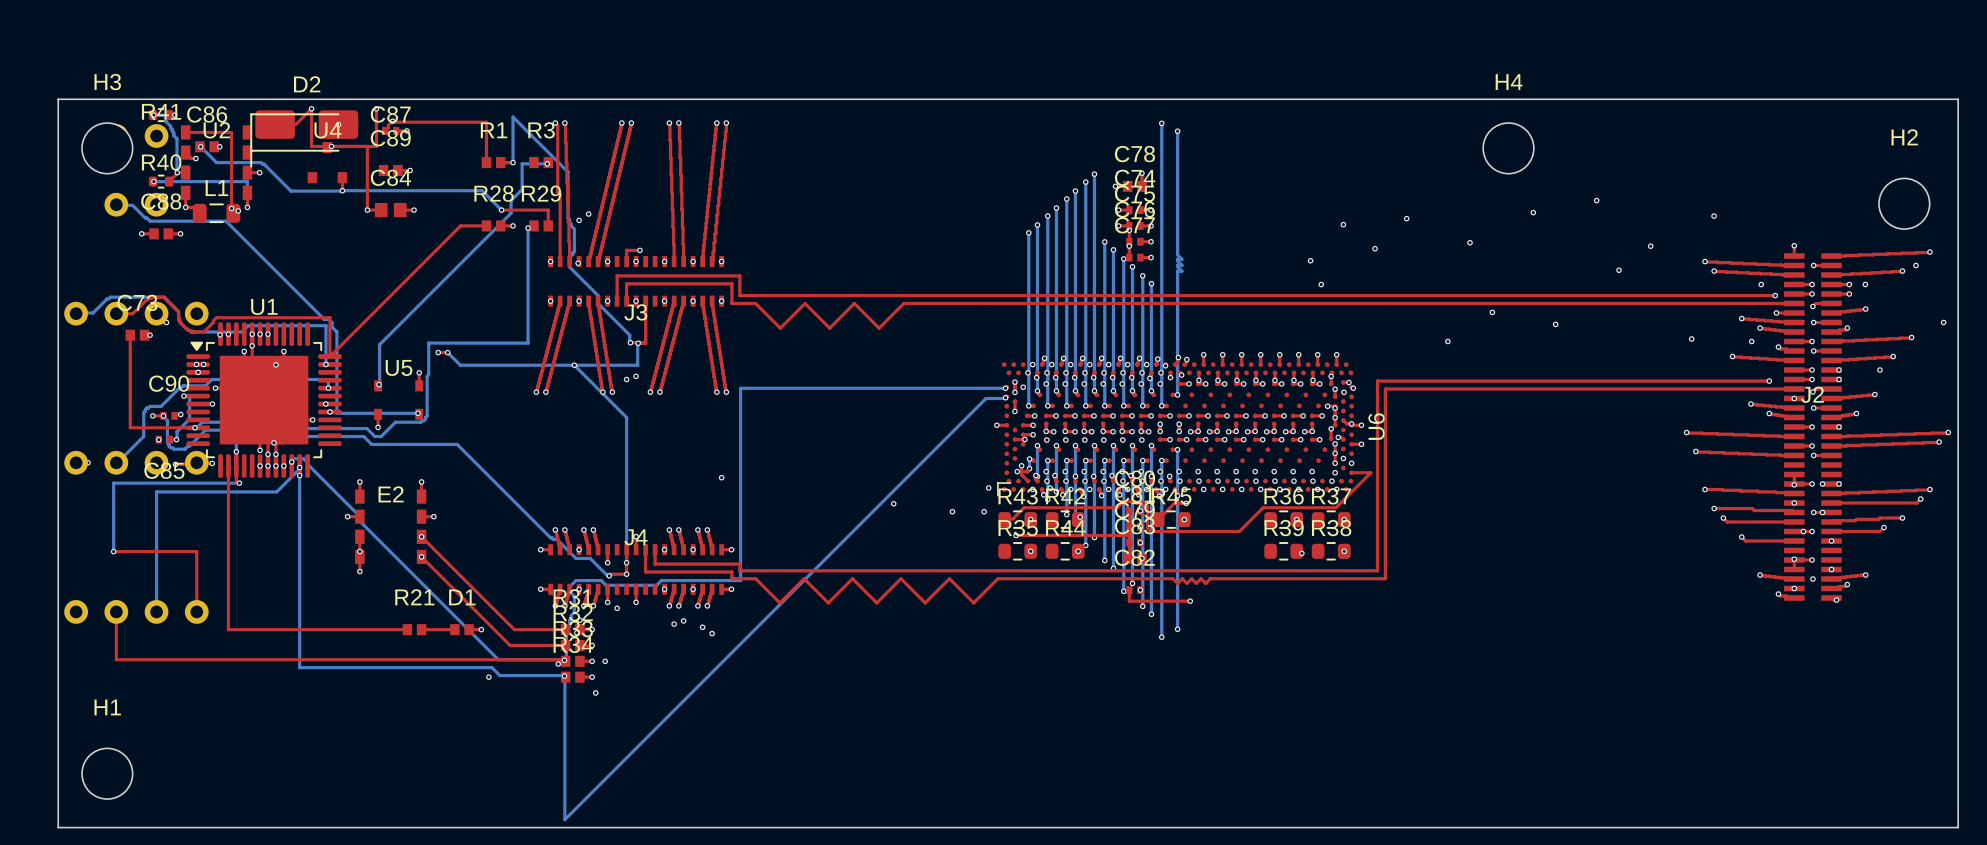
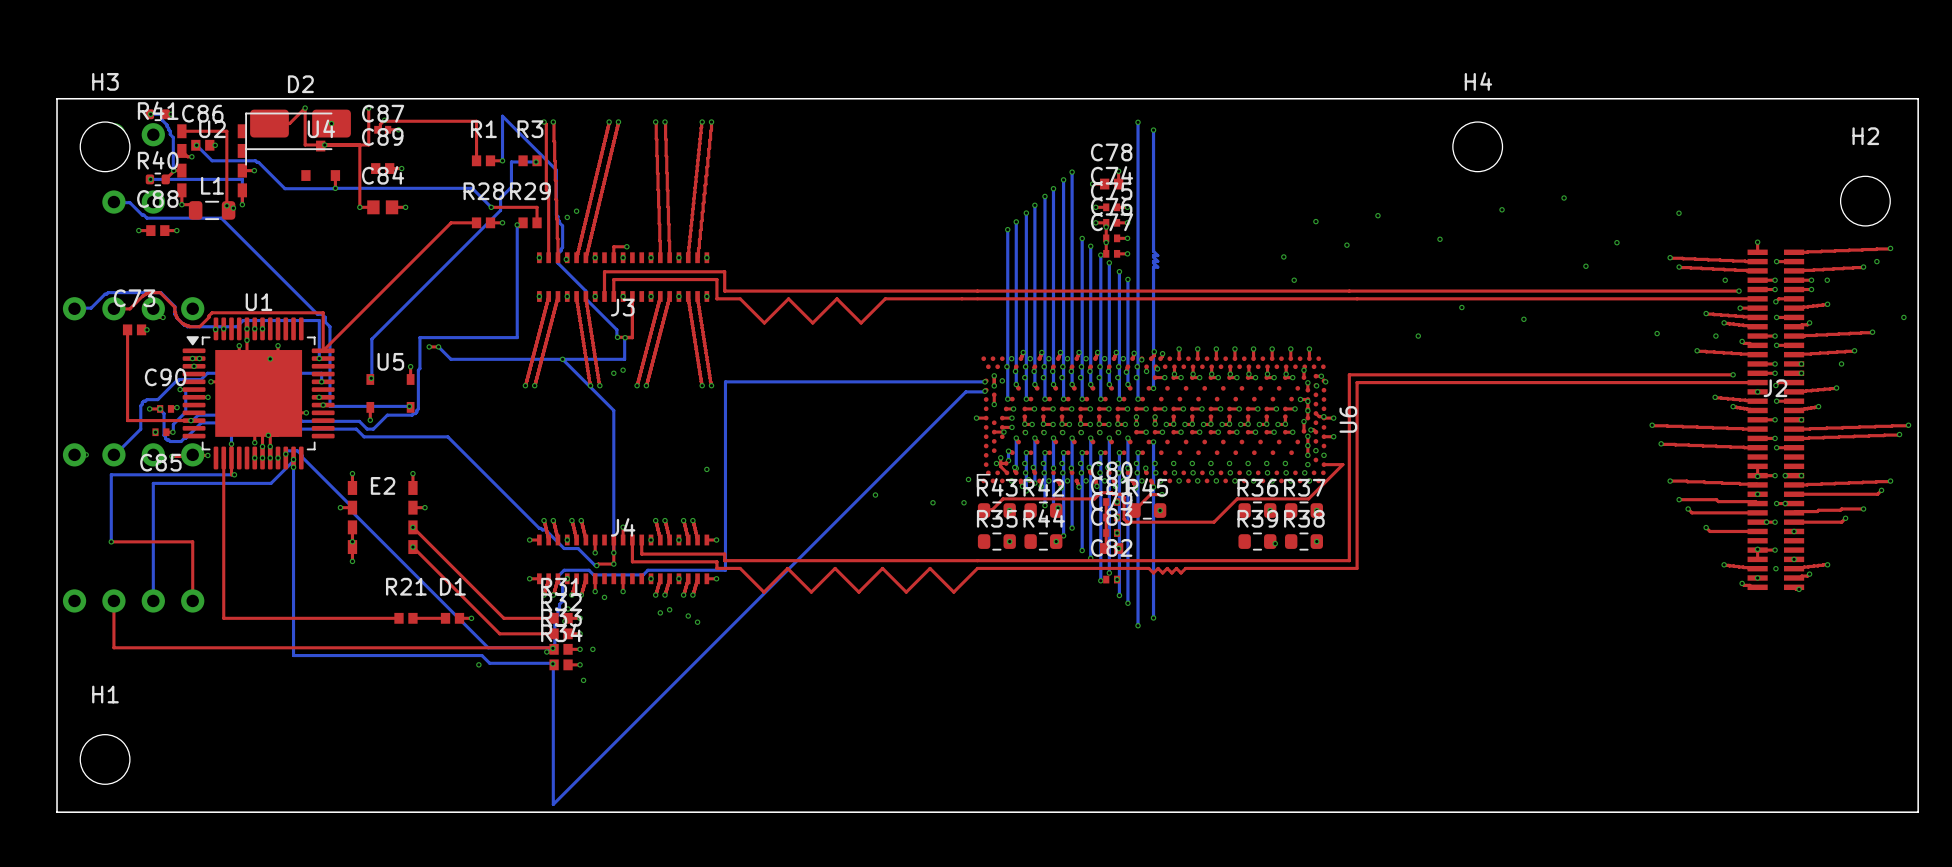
top track: (1016, 535) (1129, 535) -> none
via: (1016, 535) -> none
top track: (1129, 590) (1129, 601) (1190, 601) -> none
via: (1190, 601) -> none

